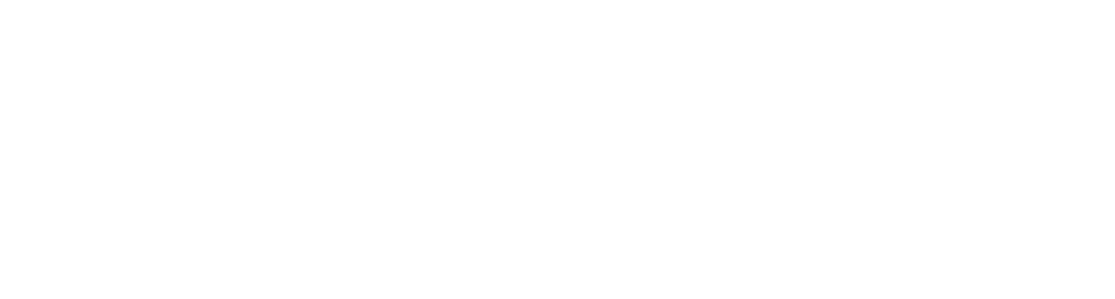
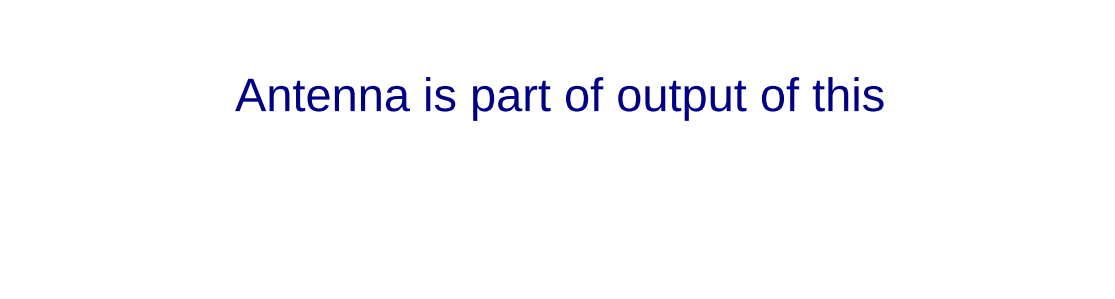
text: none -> Antenna is part of output of this (559, 98)

